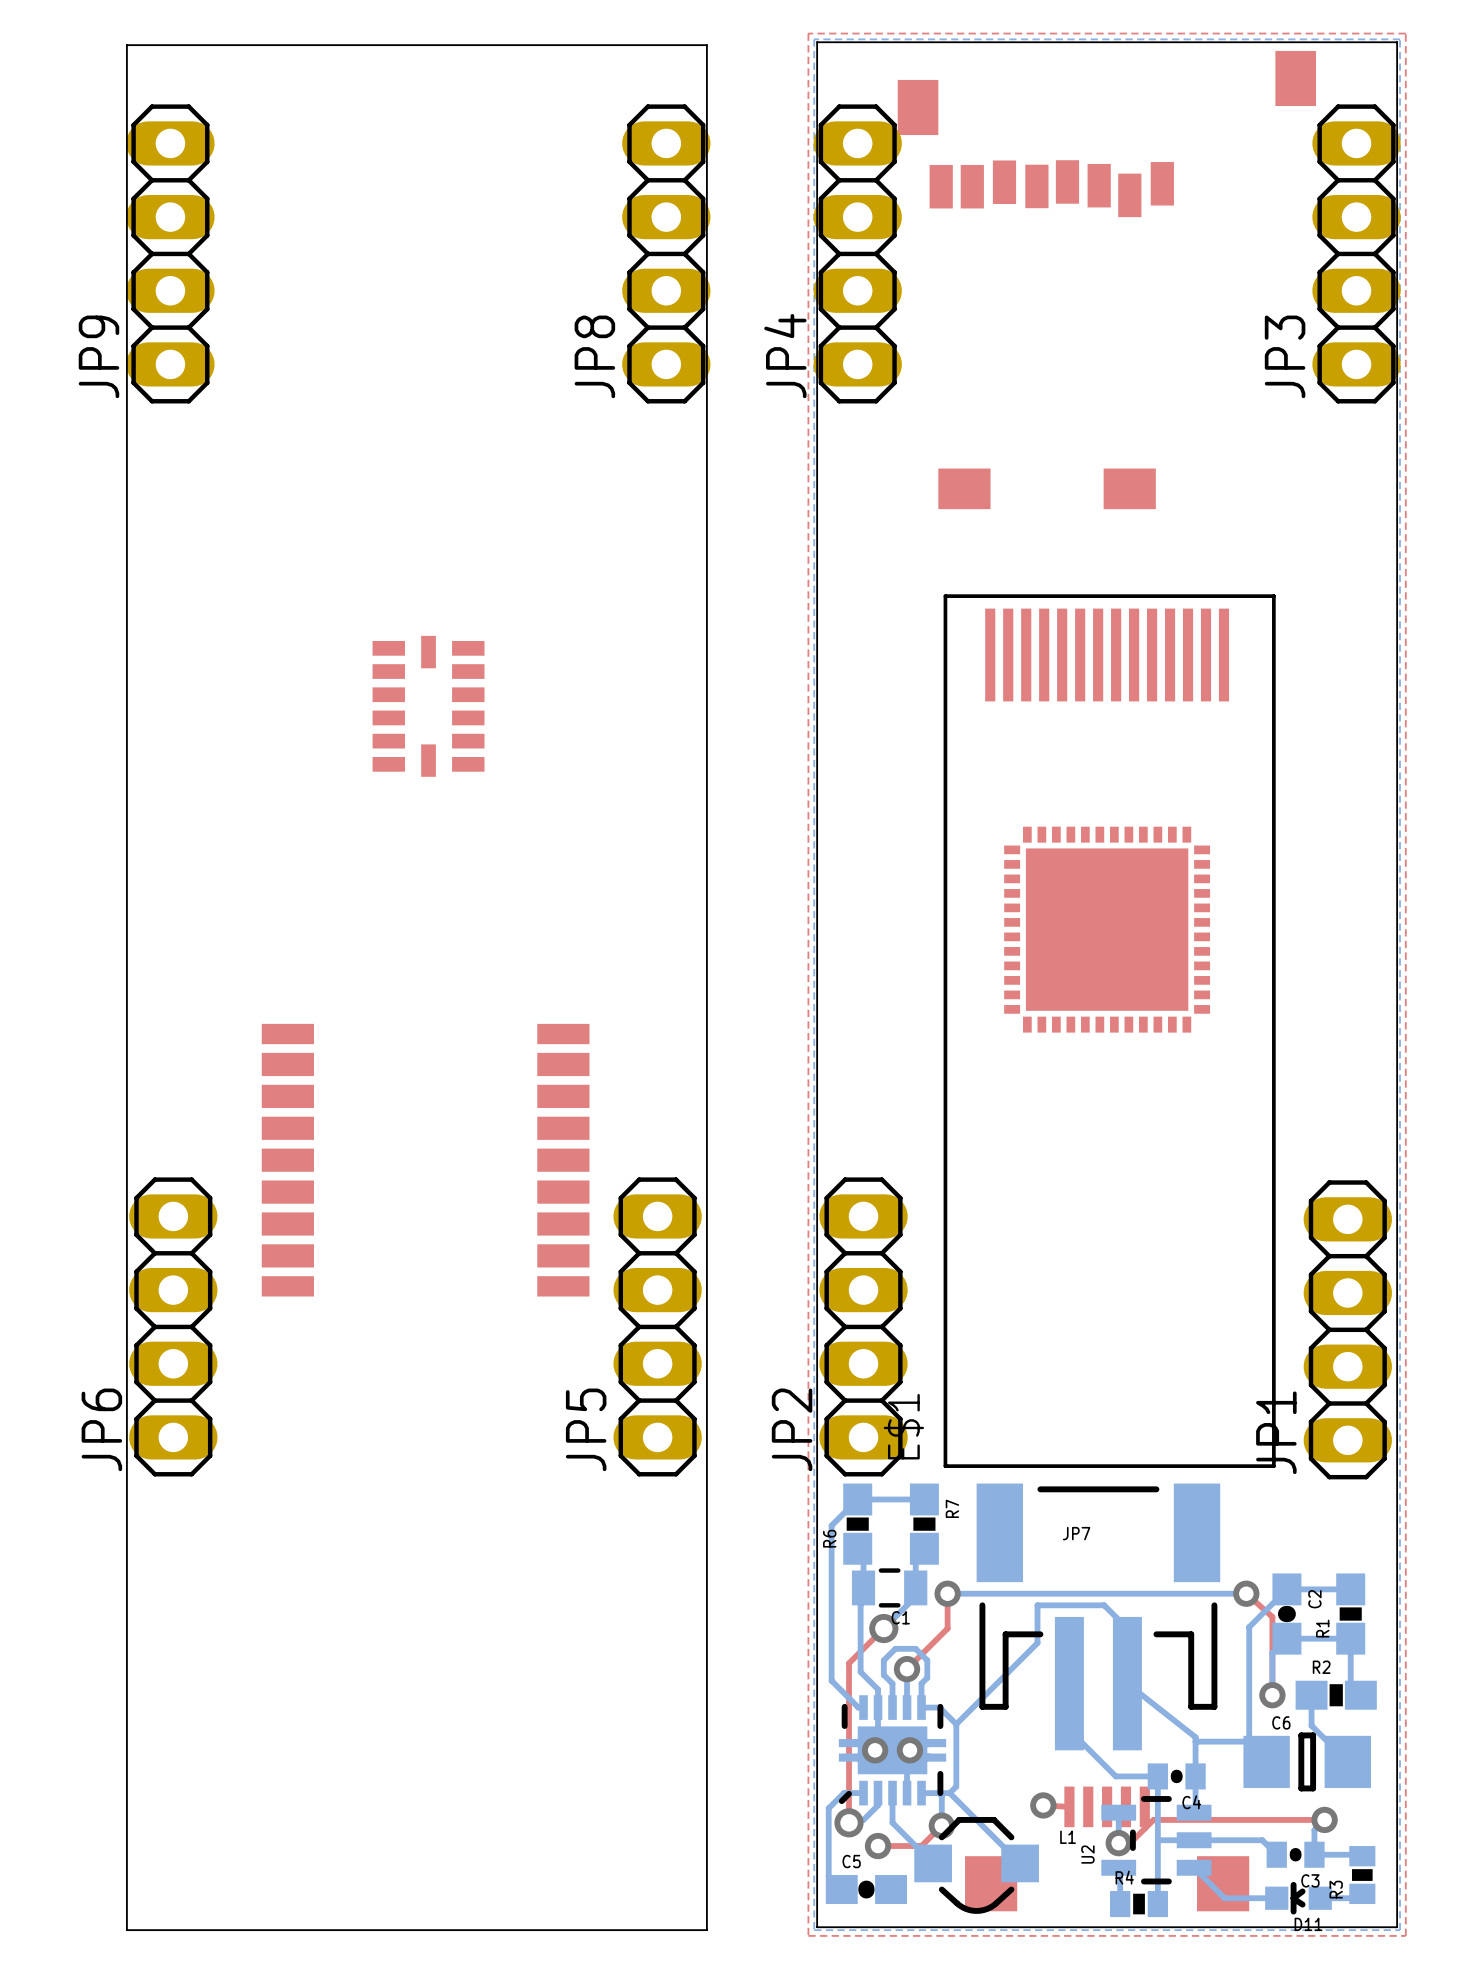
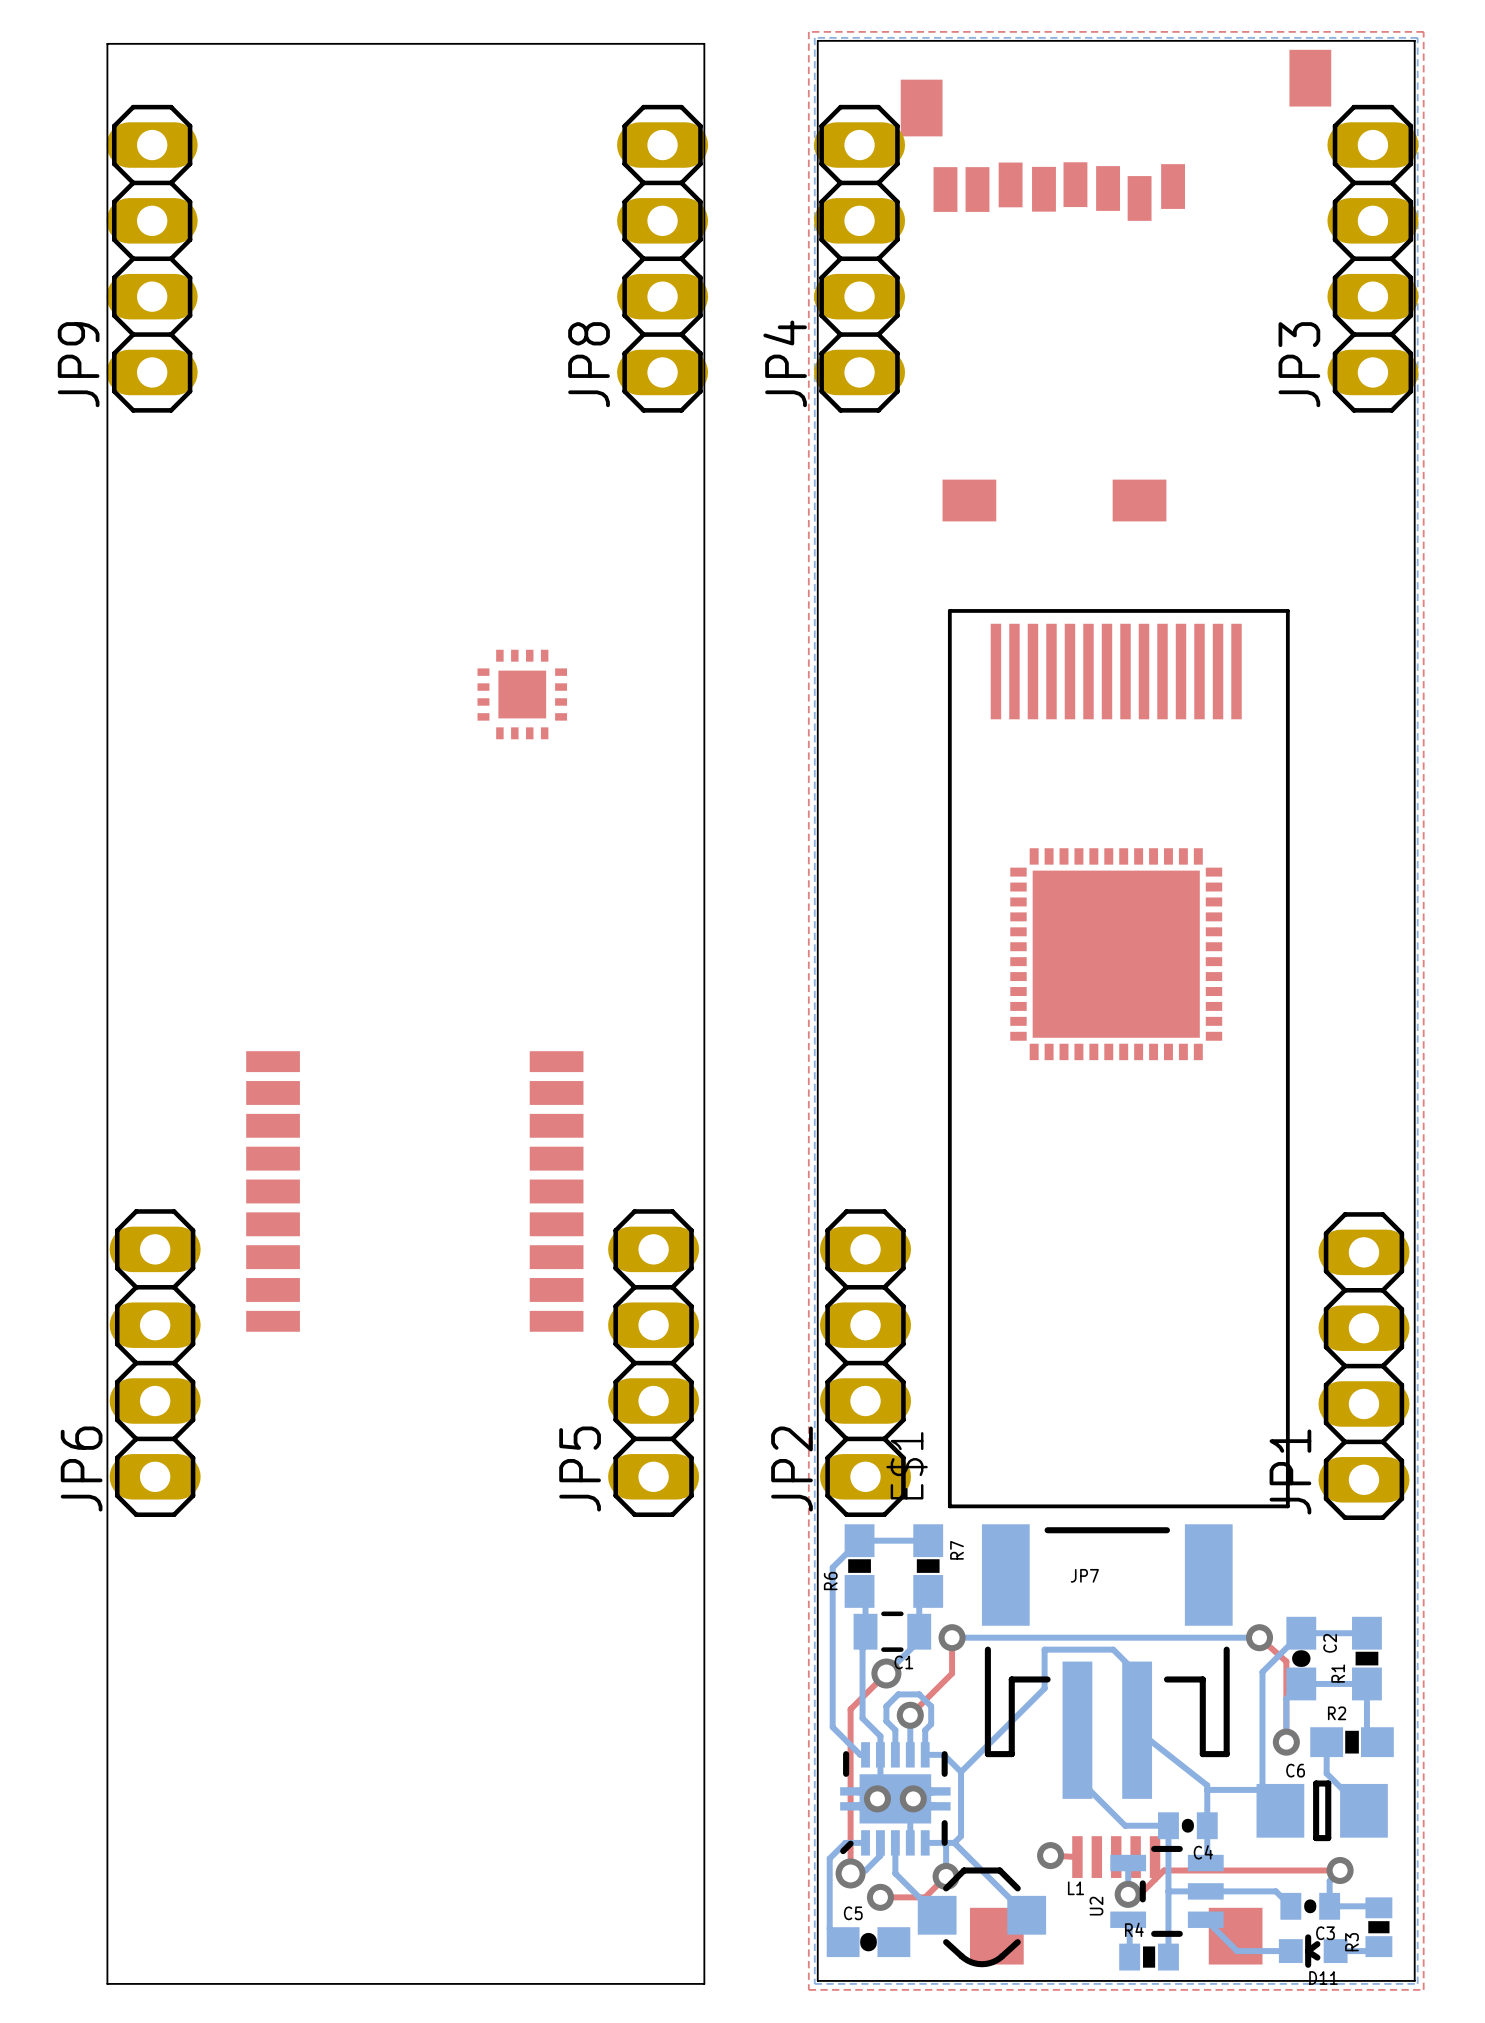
part: none -> (522, 694)
part: (428, 706) -> none

